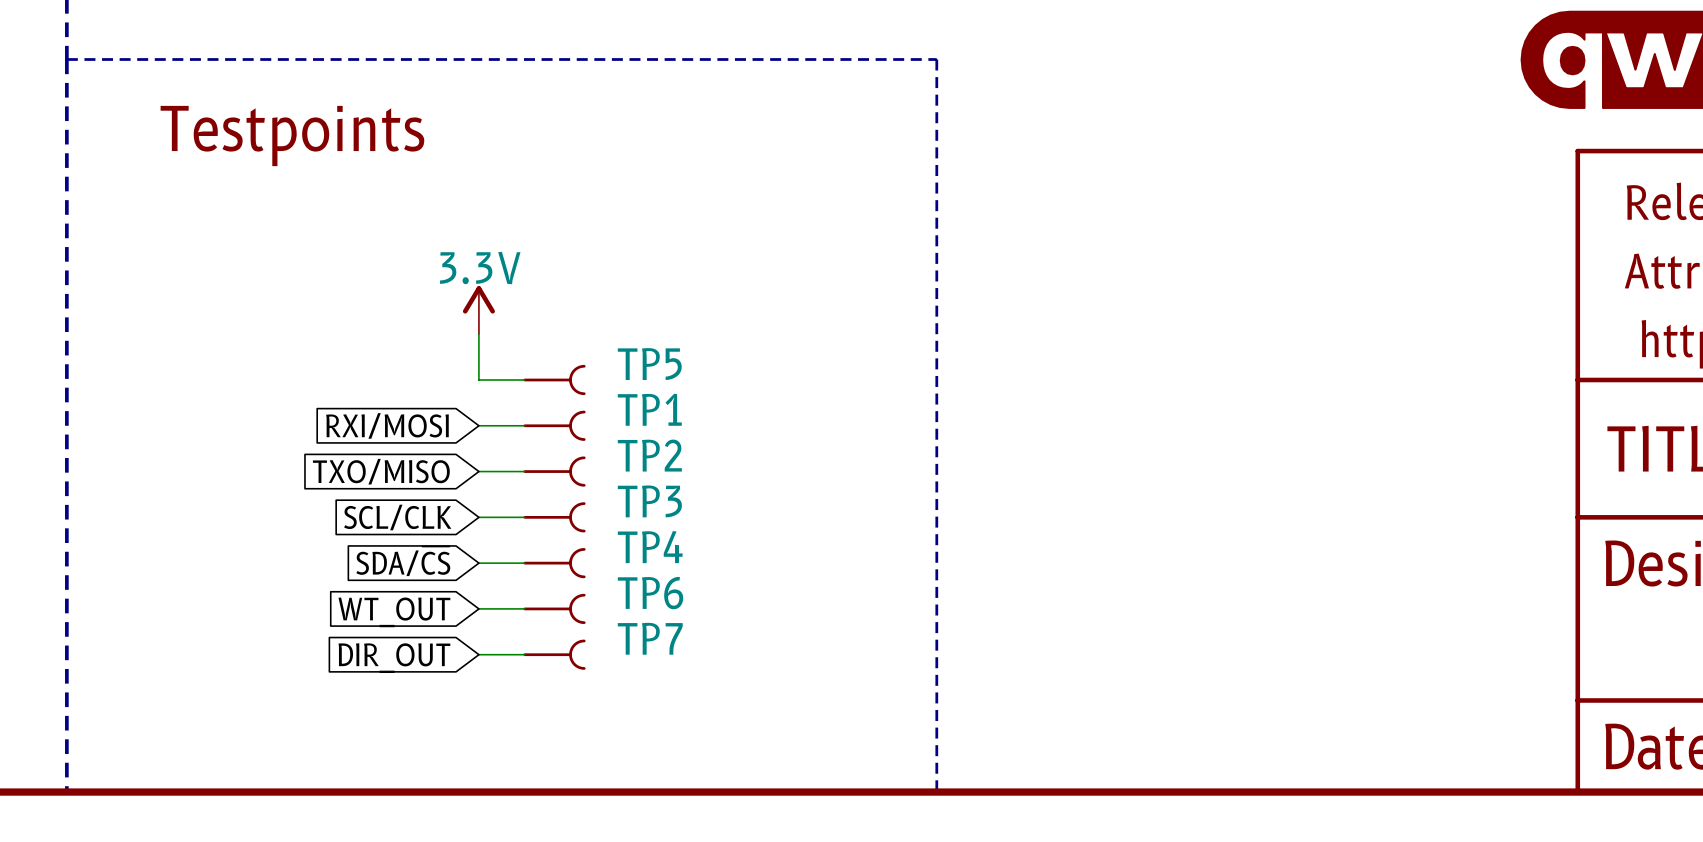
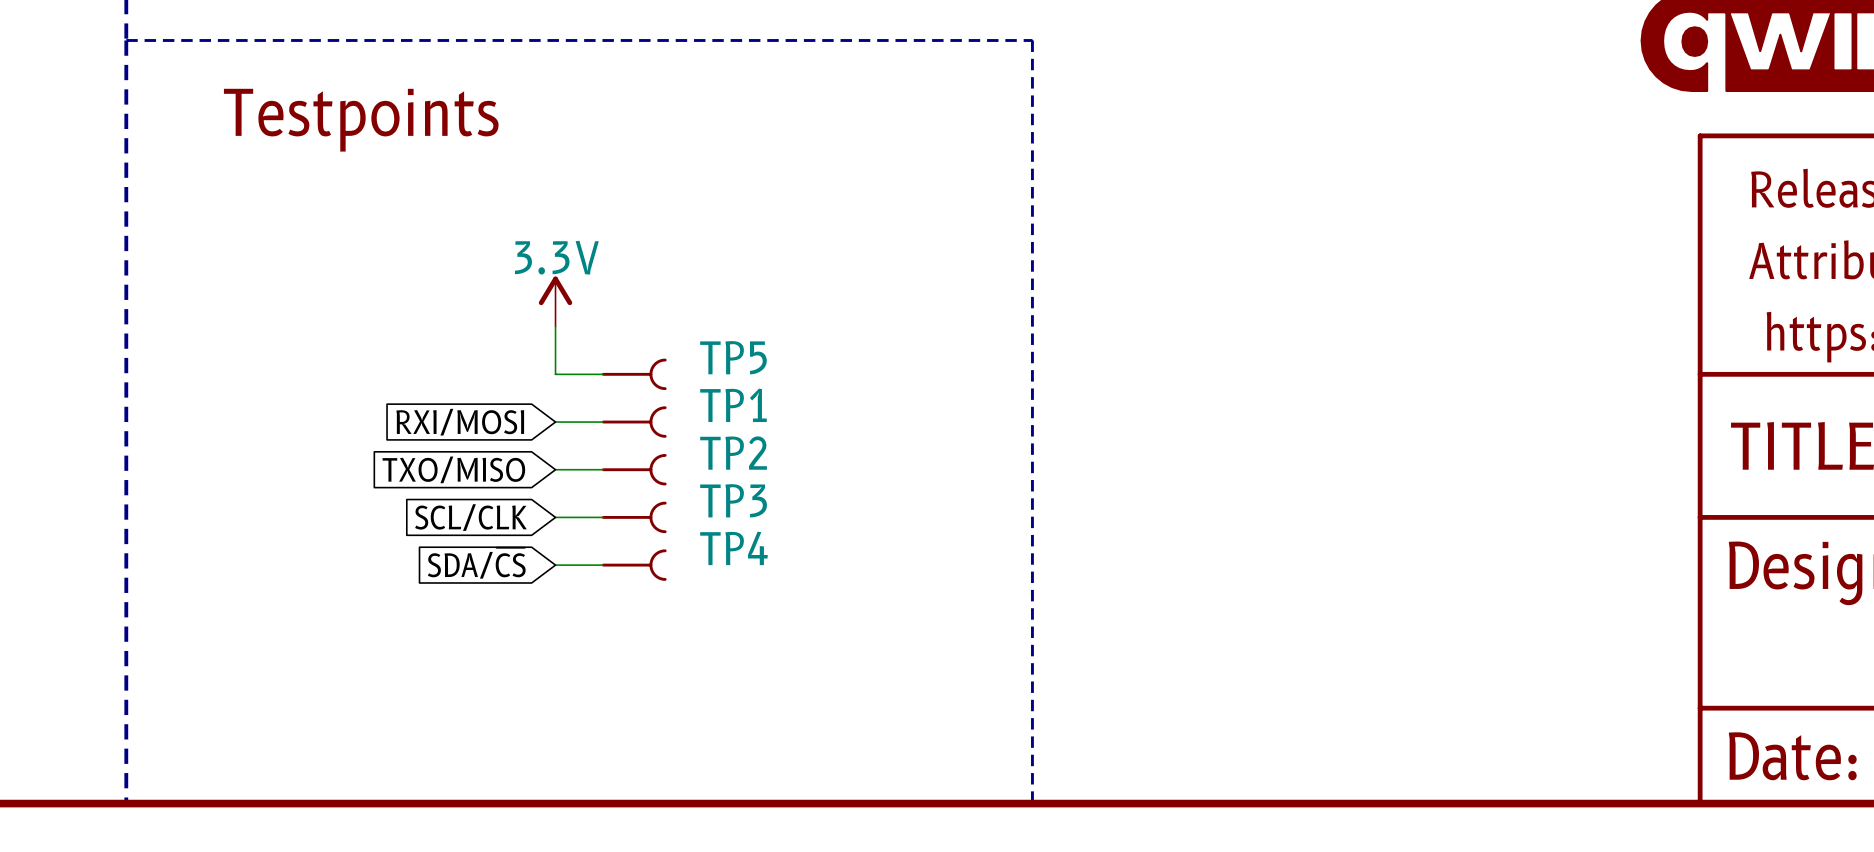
wire: (478, 608) (524, 608) -> none
TP6: (554, 608) -> none
global label: WT_OUT (394, 612) -> none
wire: (478, 654) (524, 654) -> none
TP7: (554, 654) -> none
global label: DIR_OUT (394, 658) -> none

